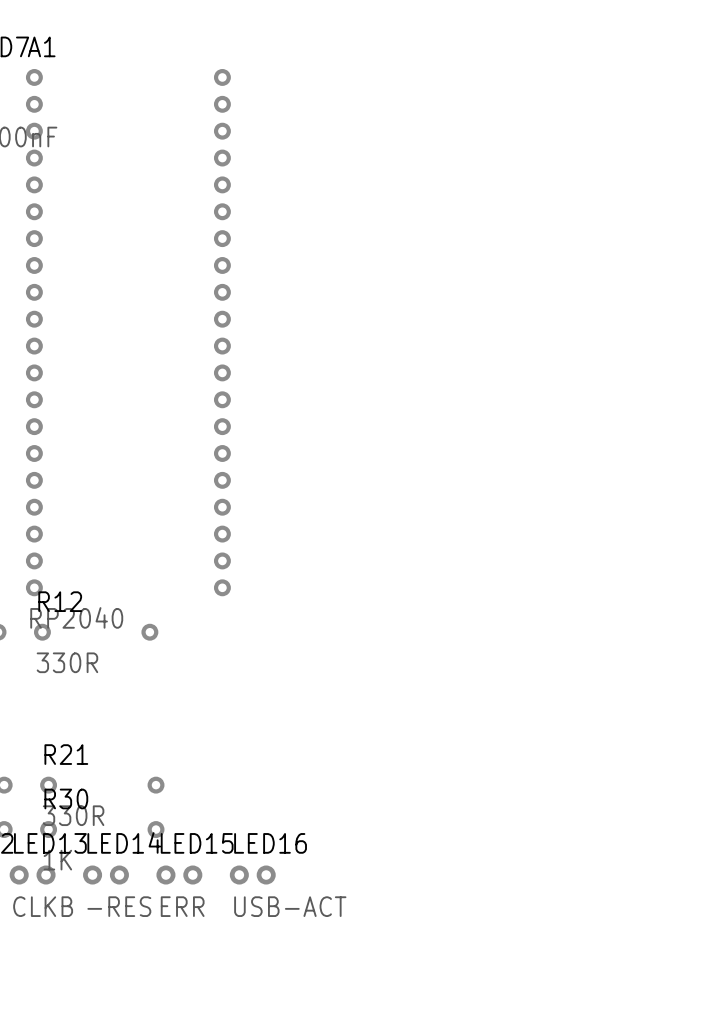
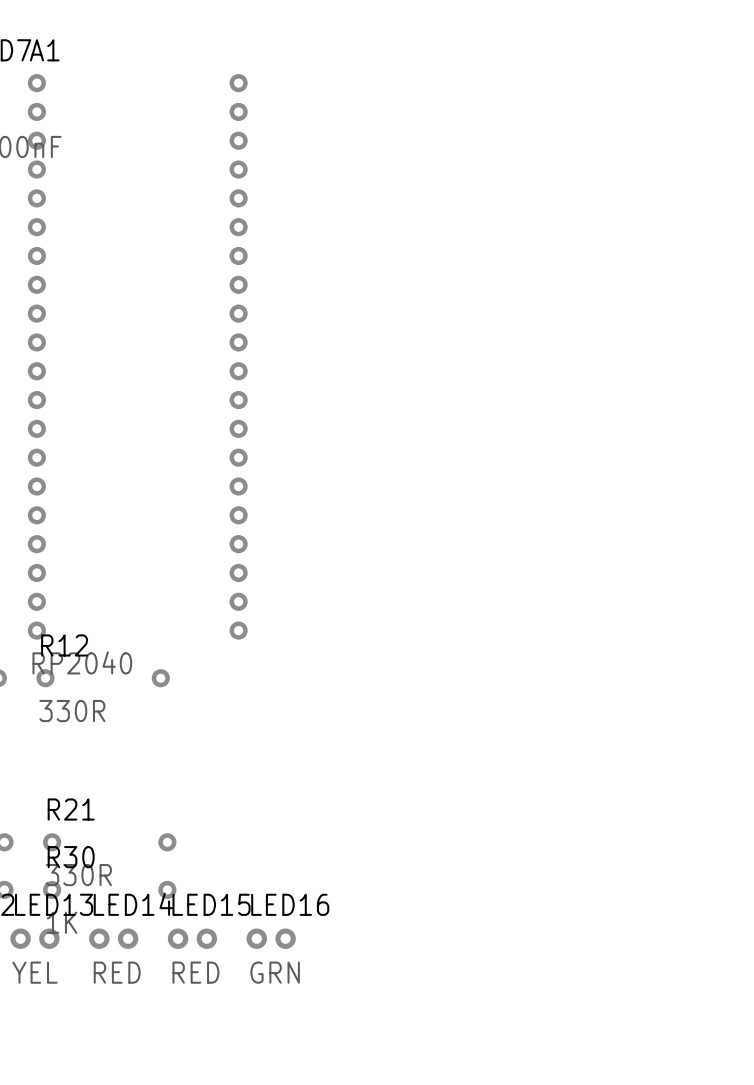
LED13 value: CLKB (43, 906) -> YEL (35, 972)
LED14 value: -RES (119, 906) -> RED (117, 972)
LED15 value: ERR (182, 906) -> RED (195, 972)
LED16 value: USB-ACT (290, 906) -> GRN (275, 972)

